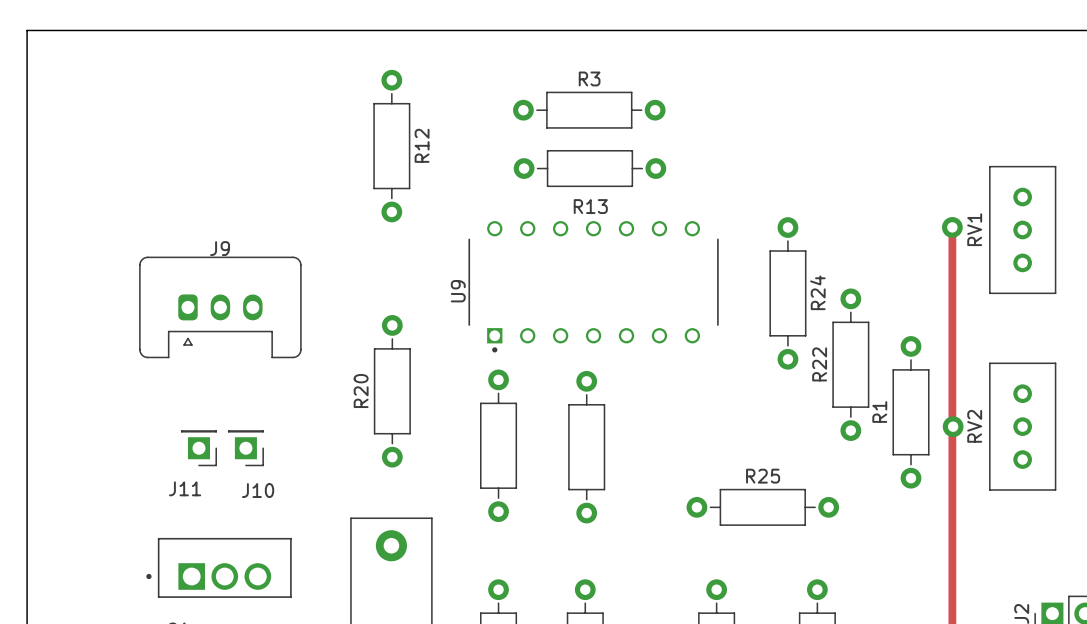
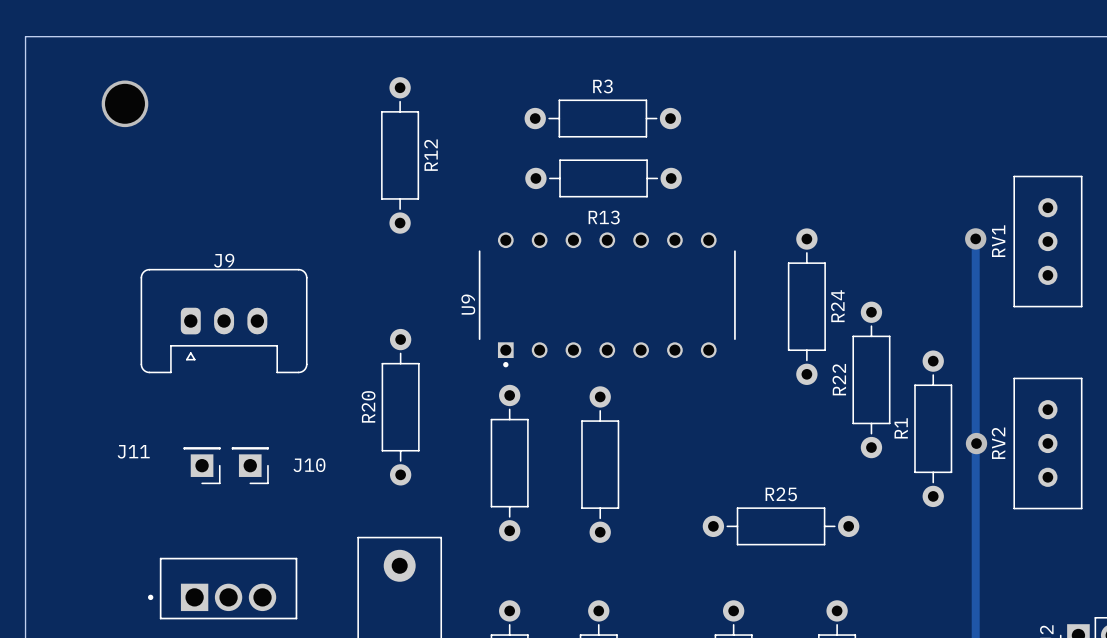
via: none -> (124, 103)
J11 name position: J11 (185, 488) -> J11 (133, 451)
J10 name position: J10 (258, 490) -> J10 (309, 465)

